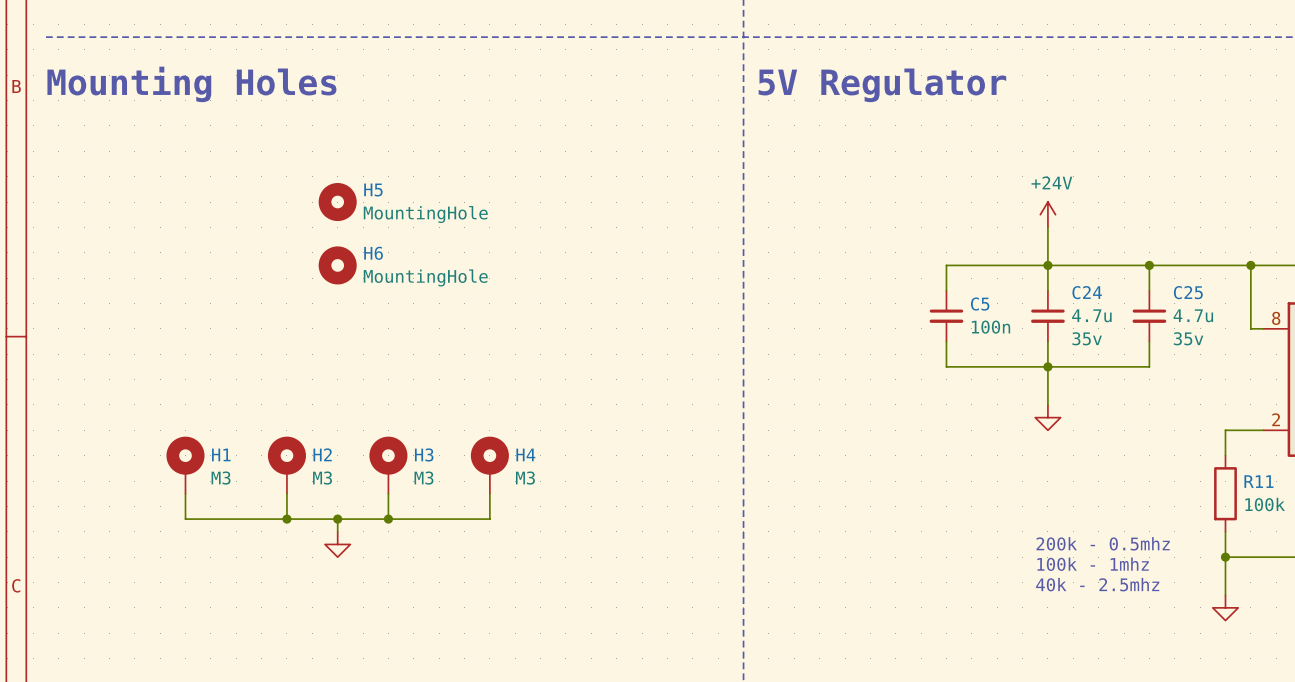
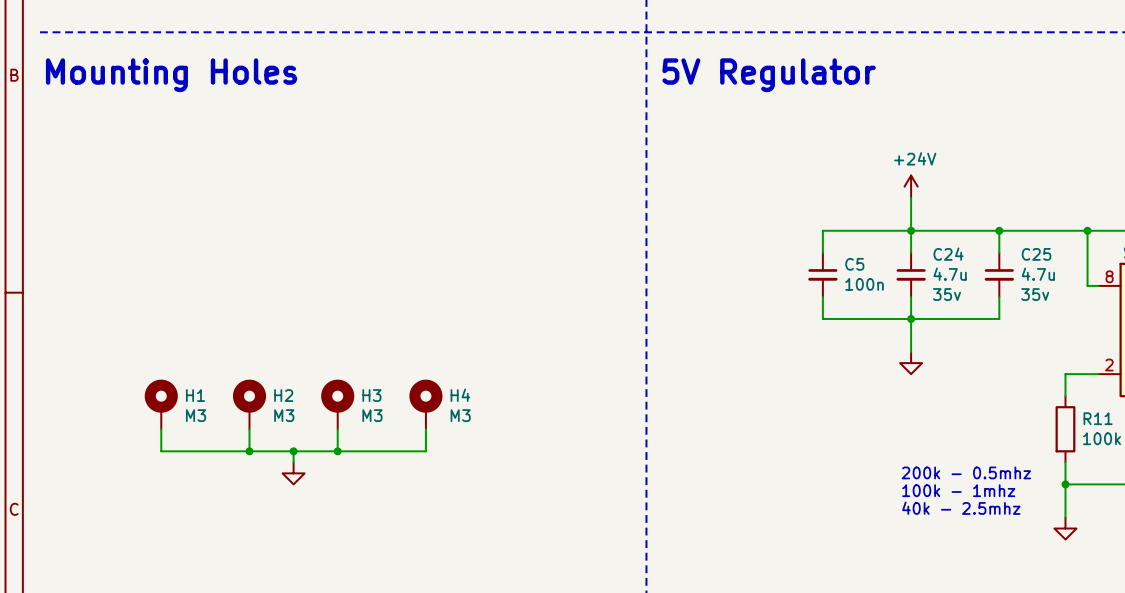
H5: MountingHole (337, 202) -> none
H6: MountingHole (337, 265) -> none

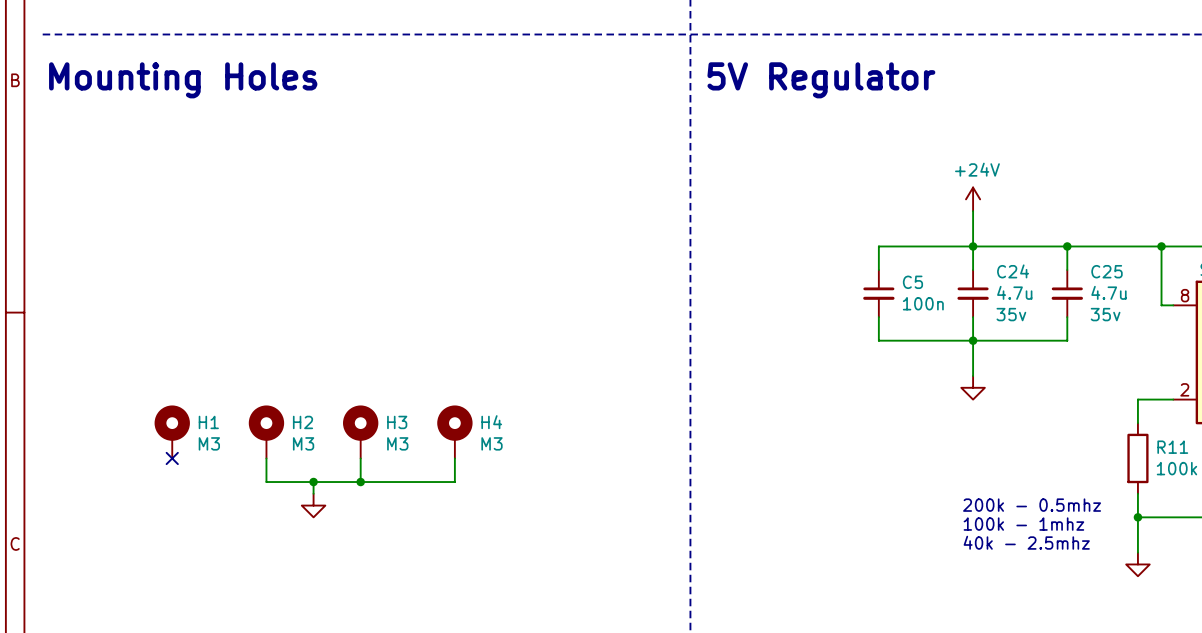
wire: (161, 429) (161, 451) (249, 451) -> none
no-connect mark: none -> (172, 458)
junction: (249, 451) -> none

